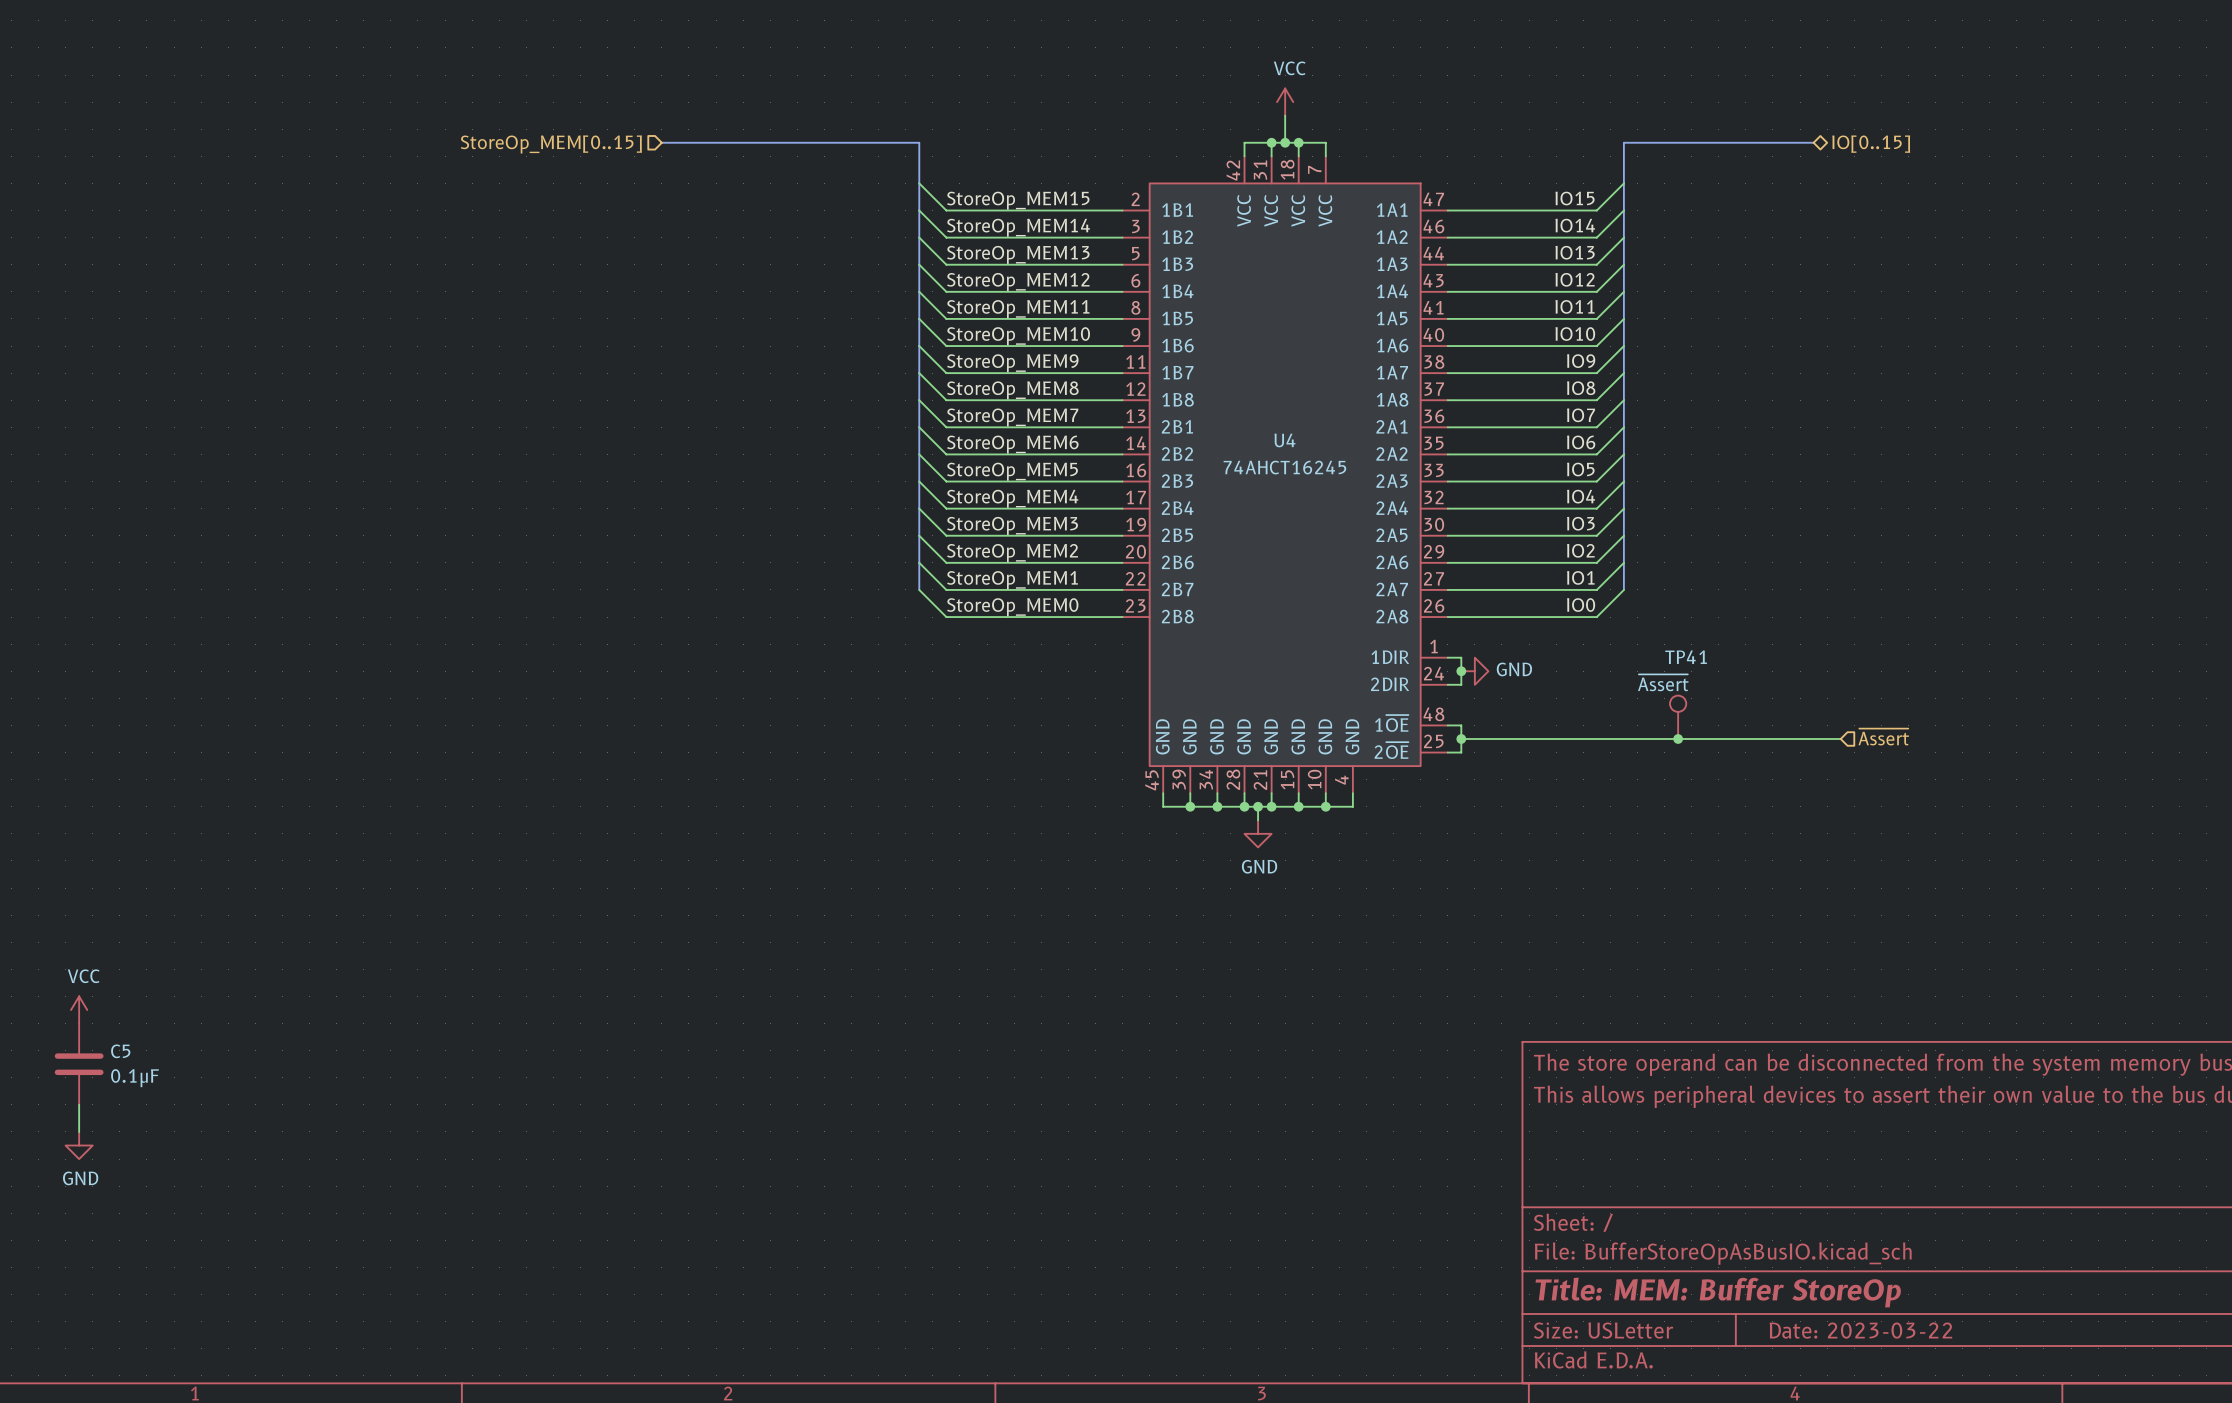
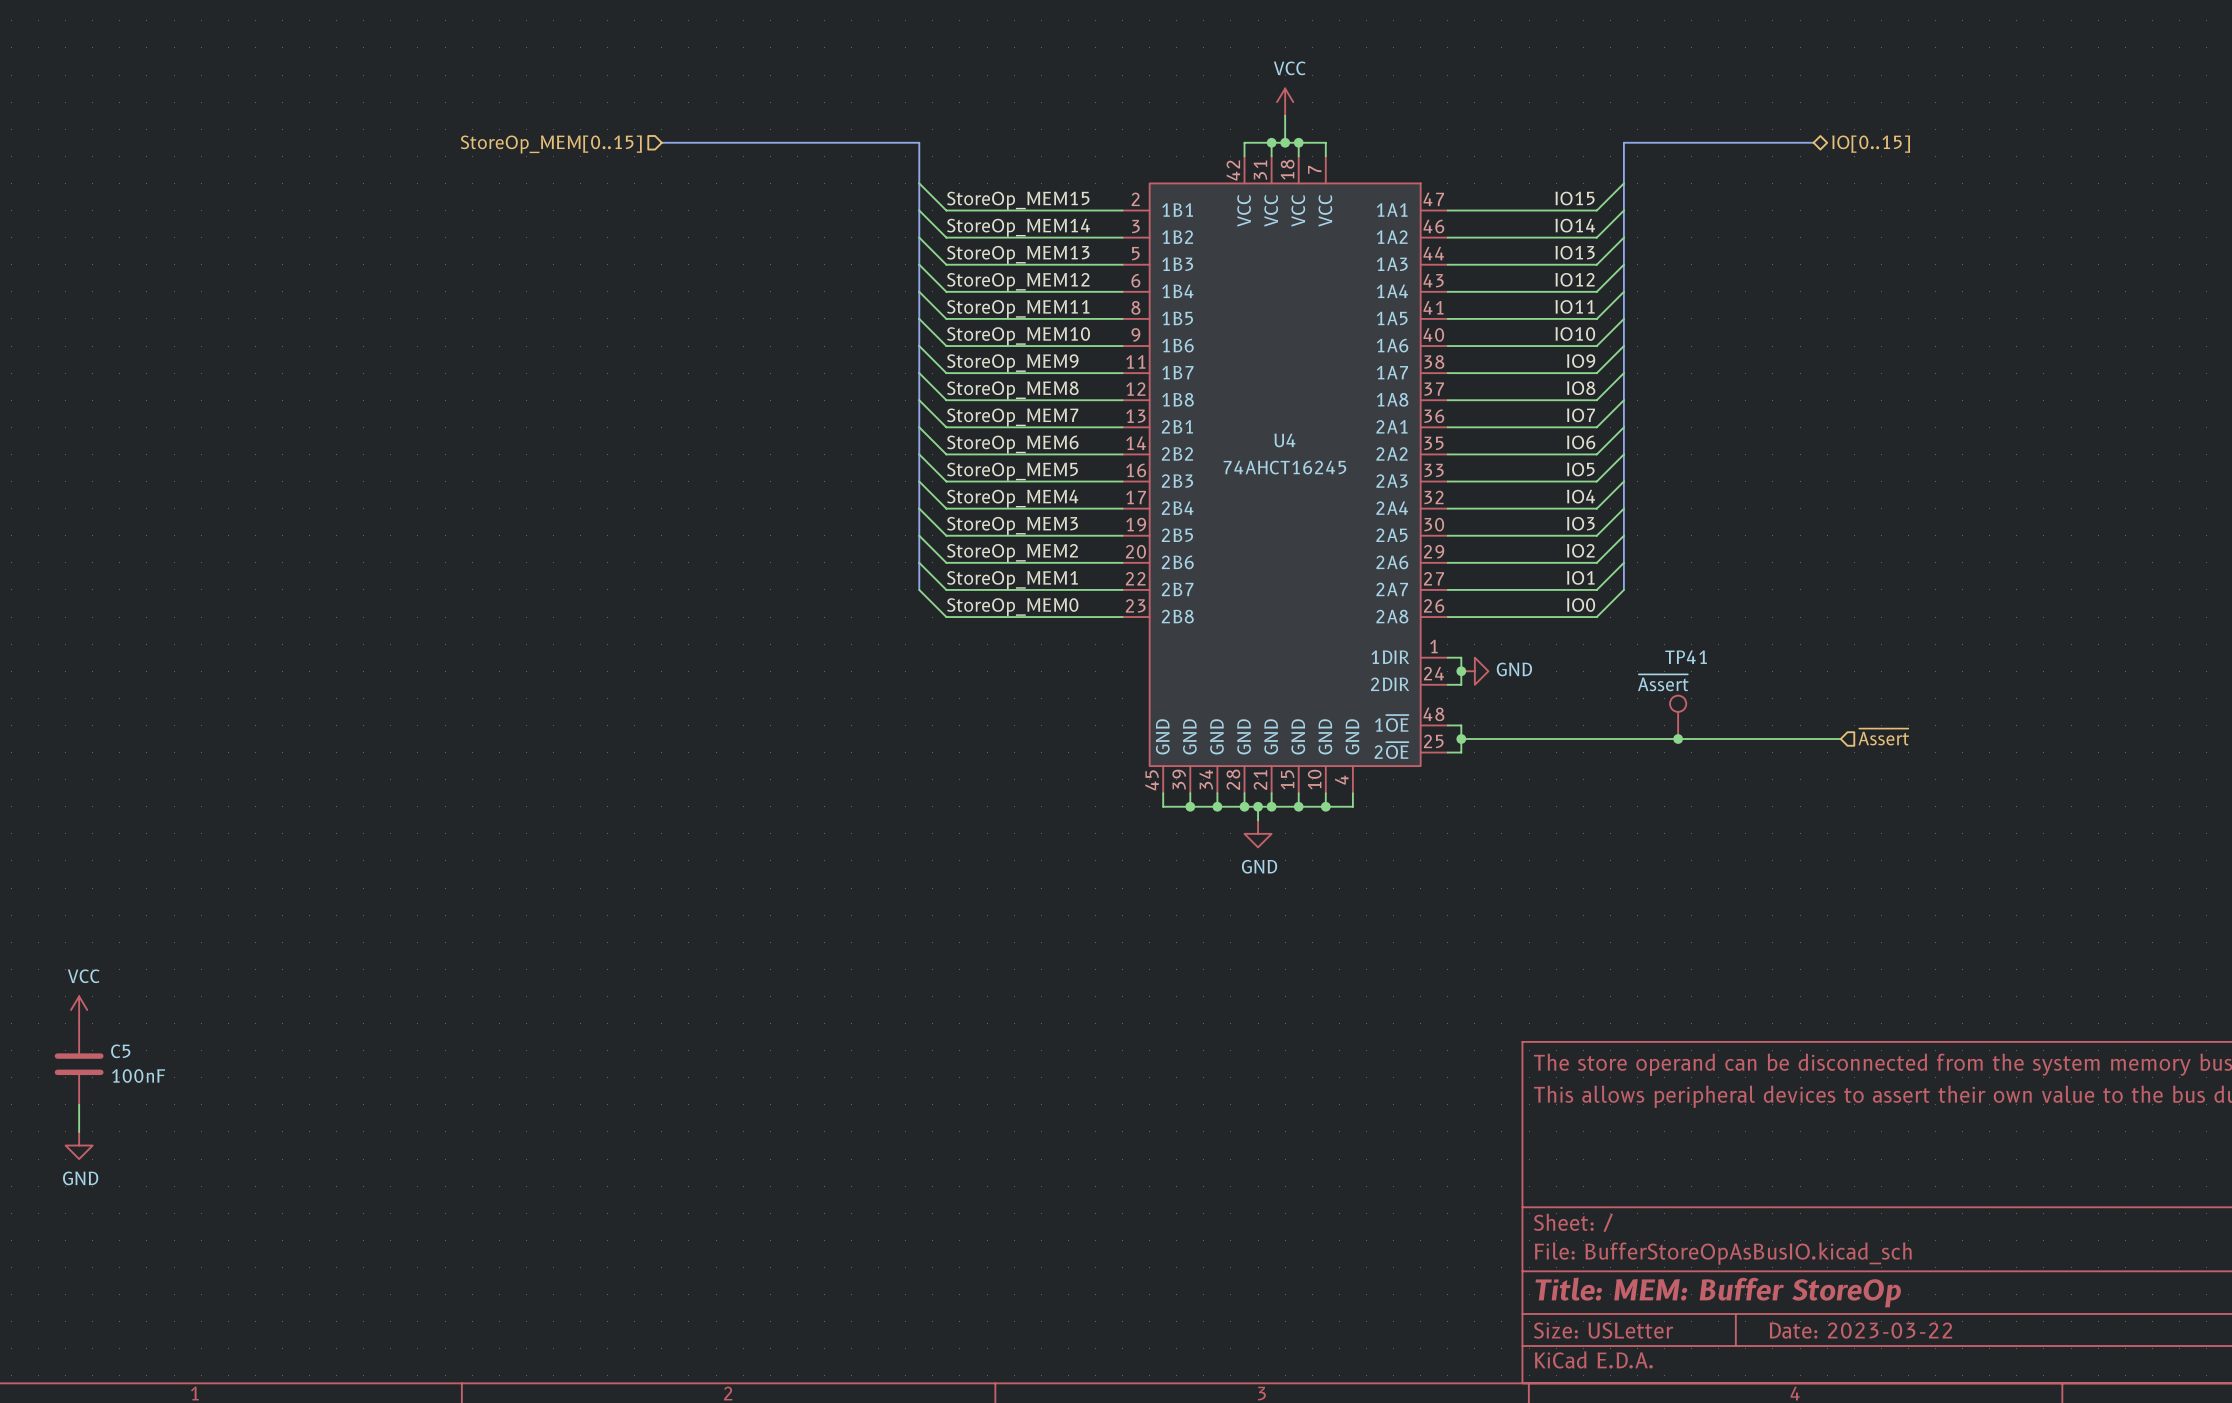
C5 value: 0.1μF (134, 1078) -> 100nF (138, 1075)

